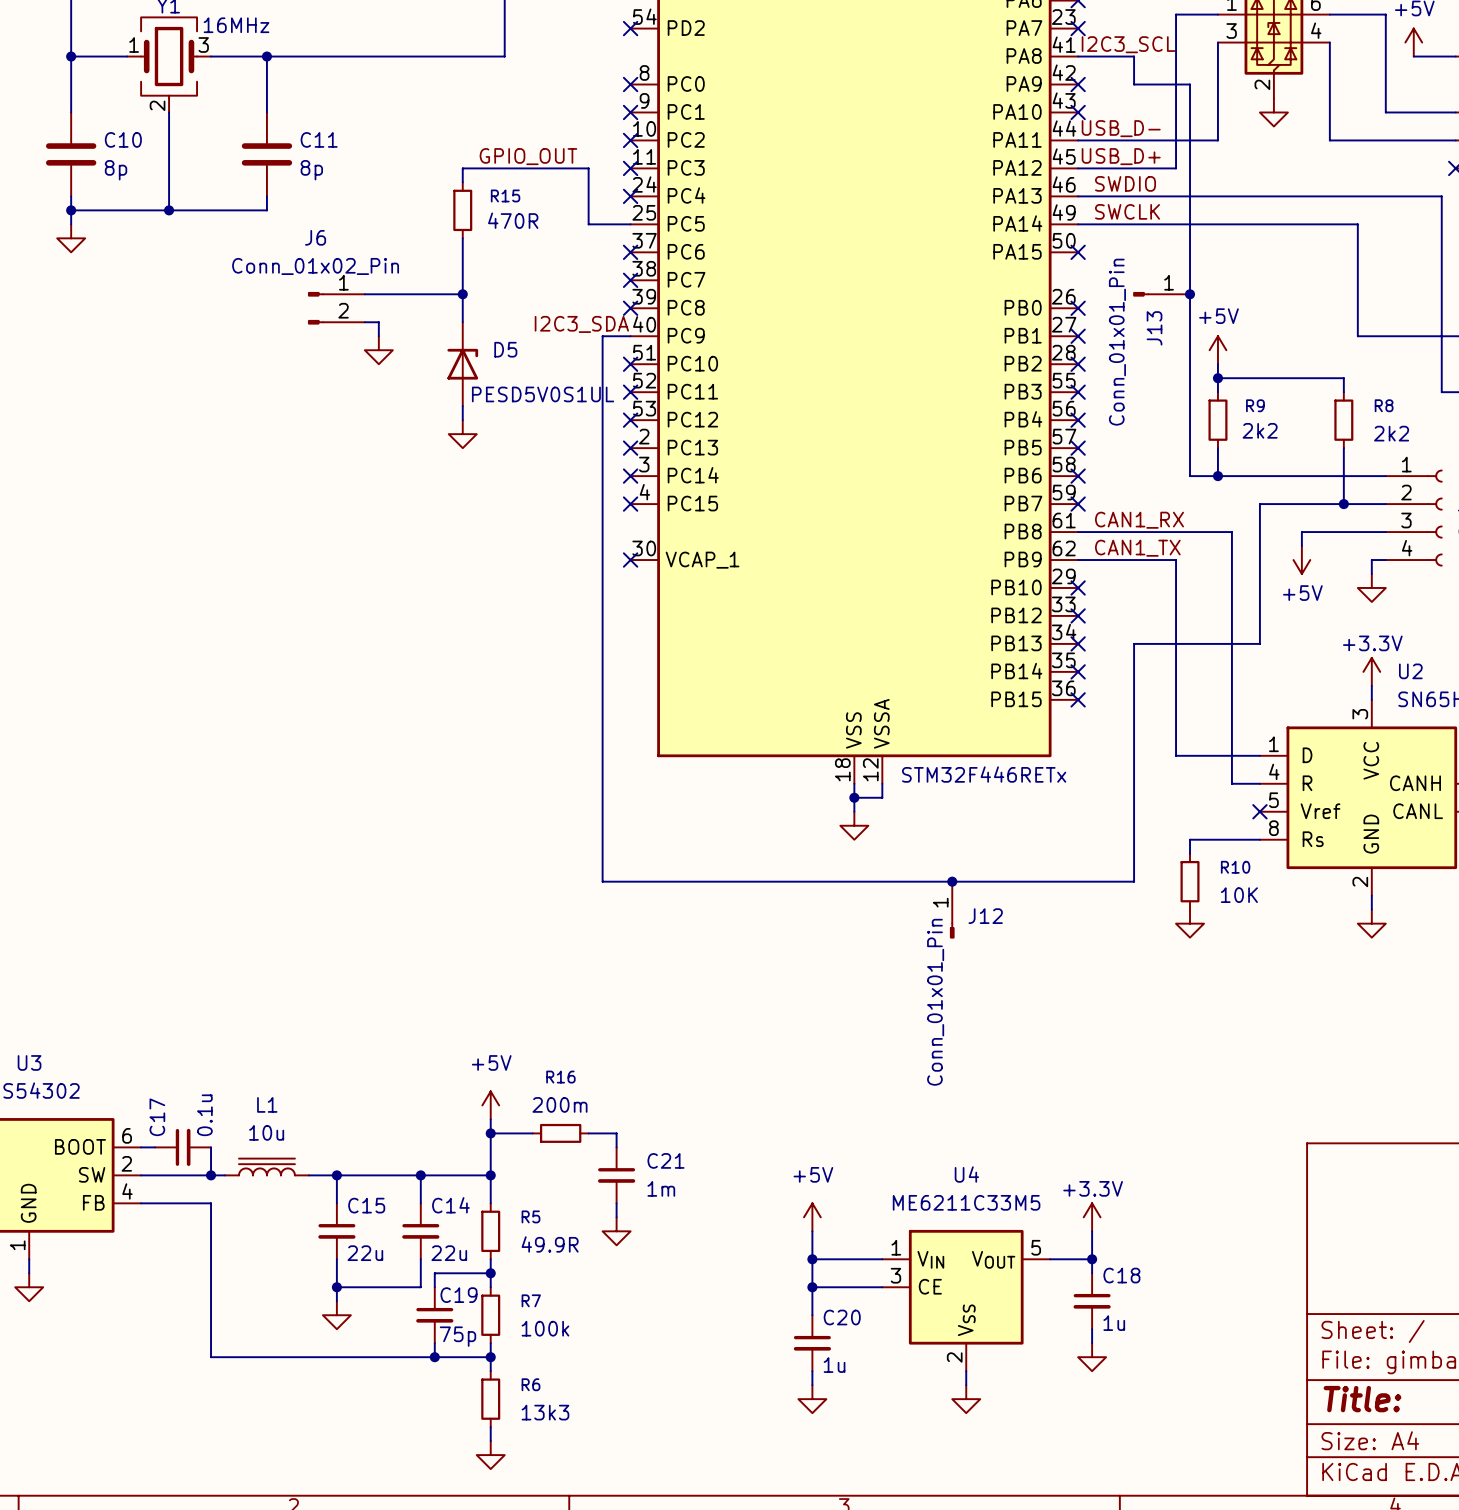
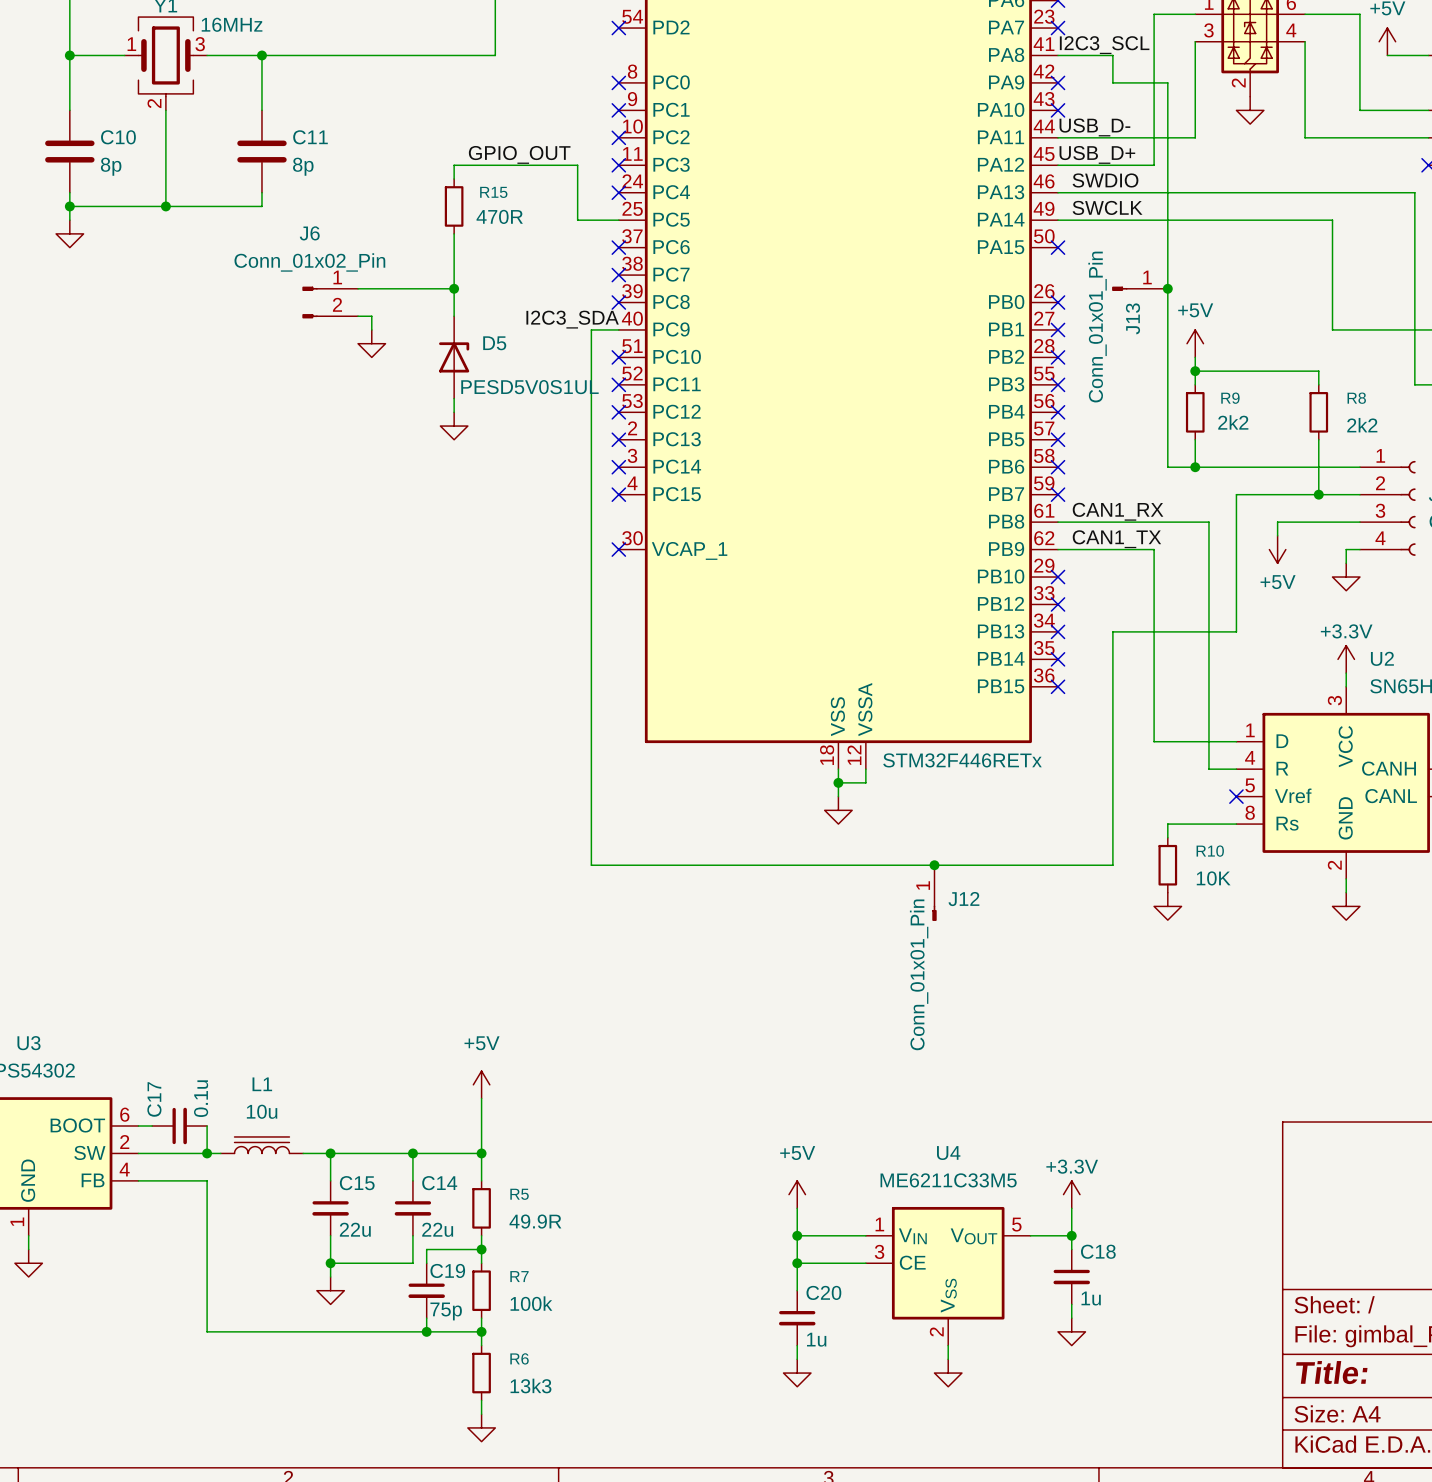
wire: (490, 1133) (532, 1133) -> none
junction: (490, 1133) -> none
R16: 200m (560, 1133) -> none
wire: (588, 1133) (616, 1133) (616, 1147) -> none
C21: 1m (616, 1175) -> none
wire: (616, 1203) (616, 1217) -> none
power symbol: (616, 1231) -> none

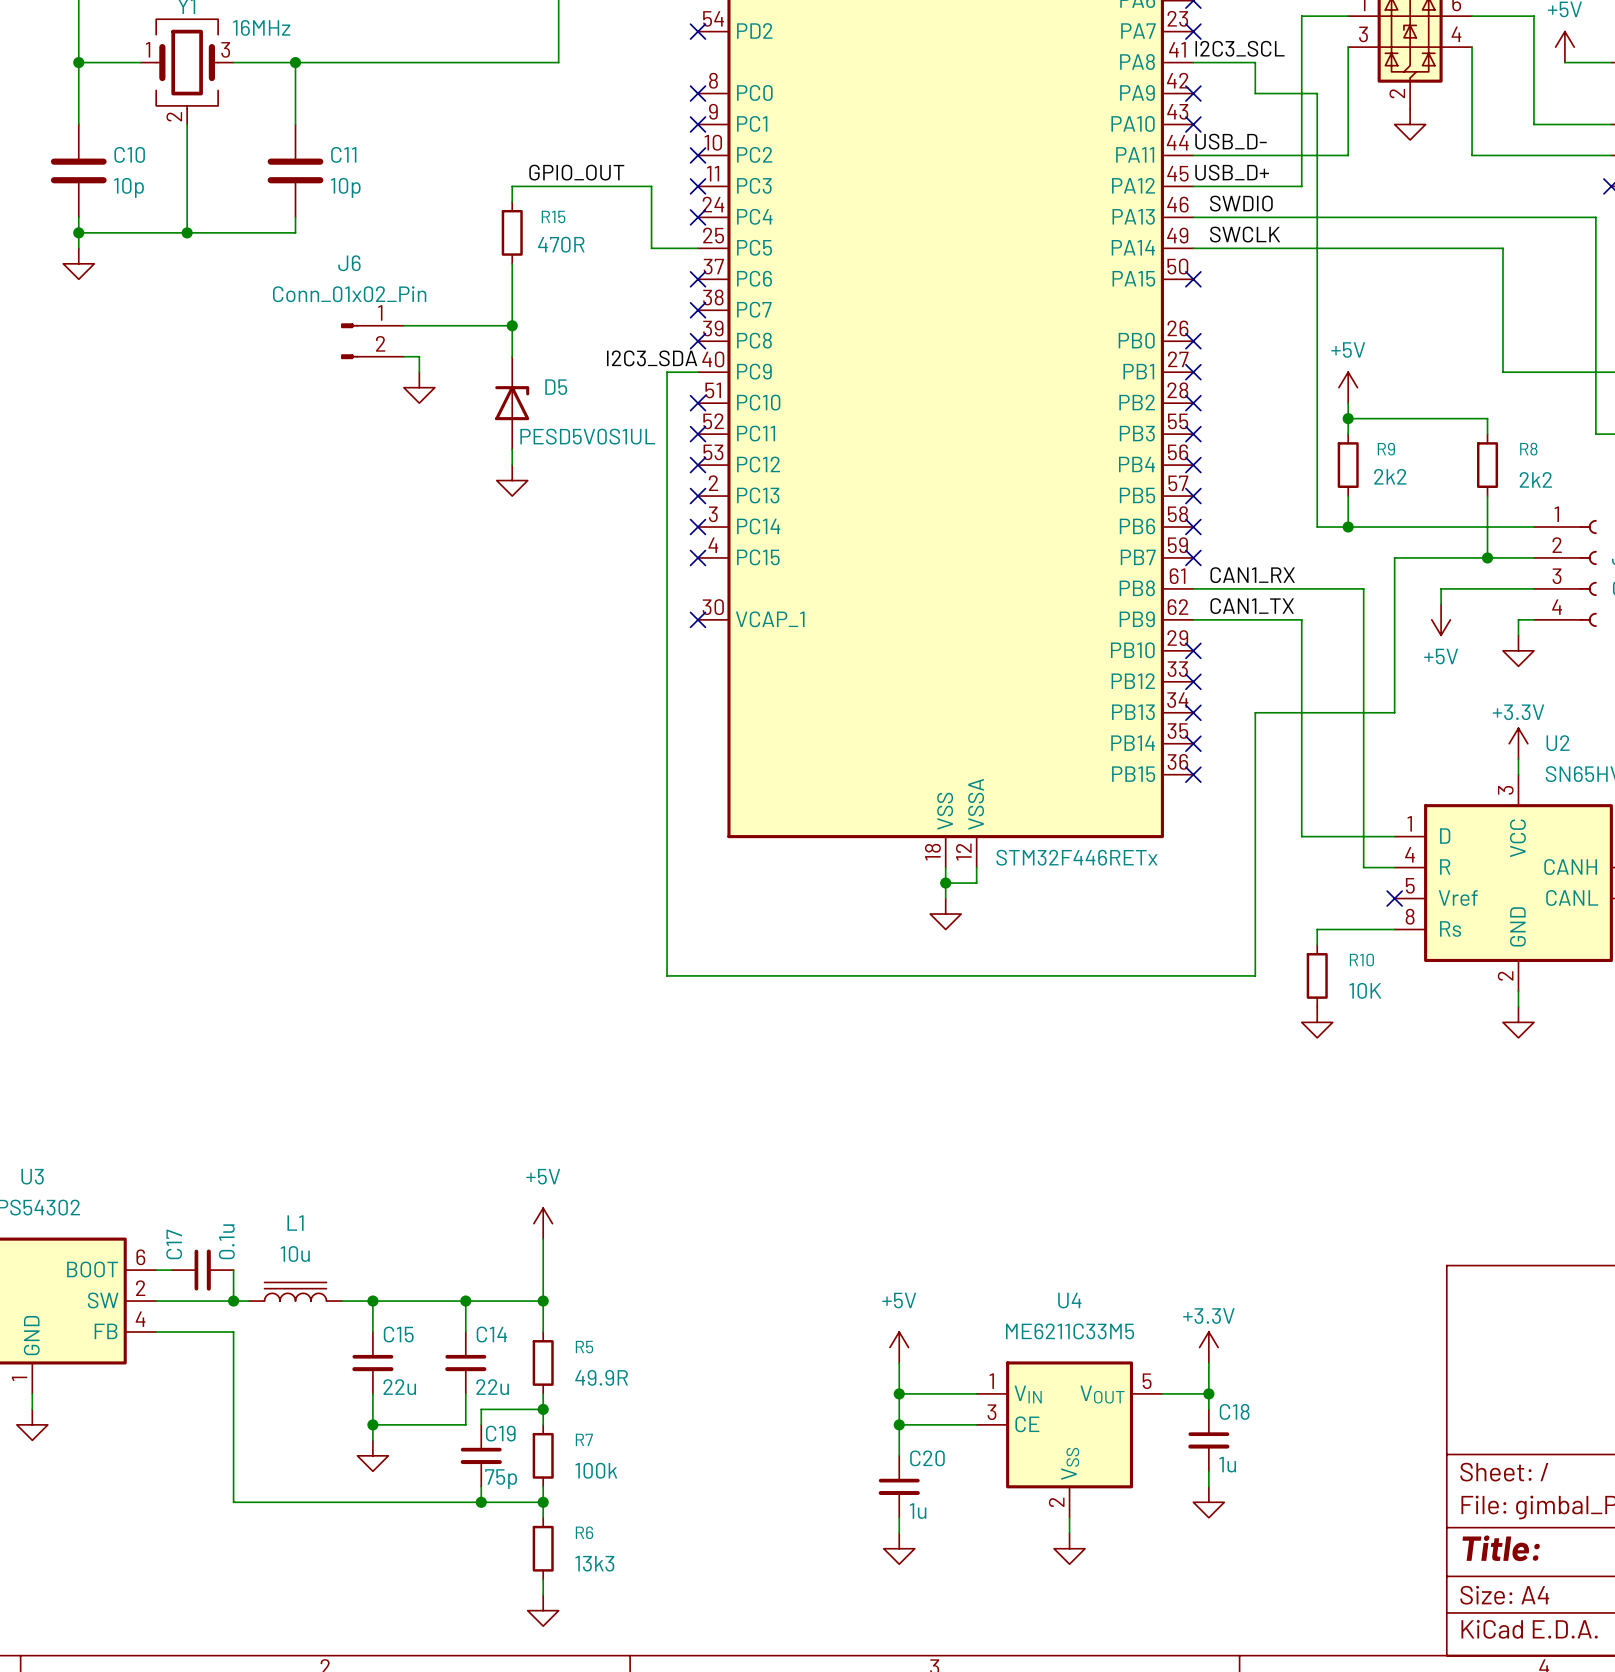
C10 value: 8p (111, 166) -> 10p (128, 187)
C11 value: 8p (303, 166) -> 10p (345, 187)
J13: Conn_01x01_Pin (1139, 288) -> none
junction: (1167, 288) -> none
junction: (934, 865) -> none
J12: Conn_01x01_Pin (934, 893) -> none

